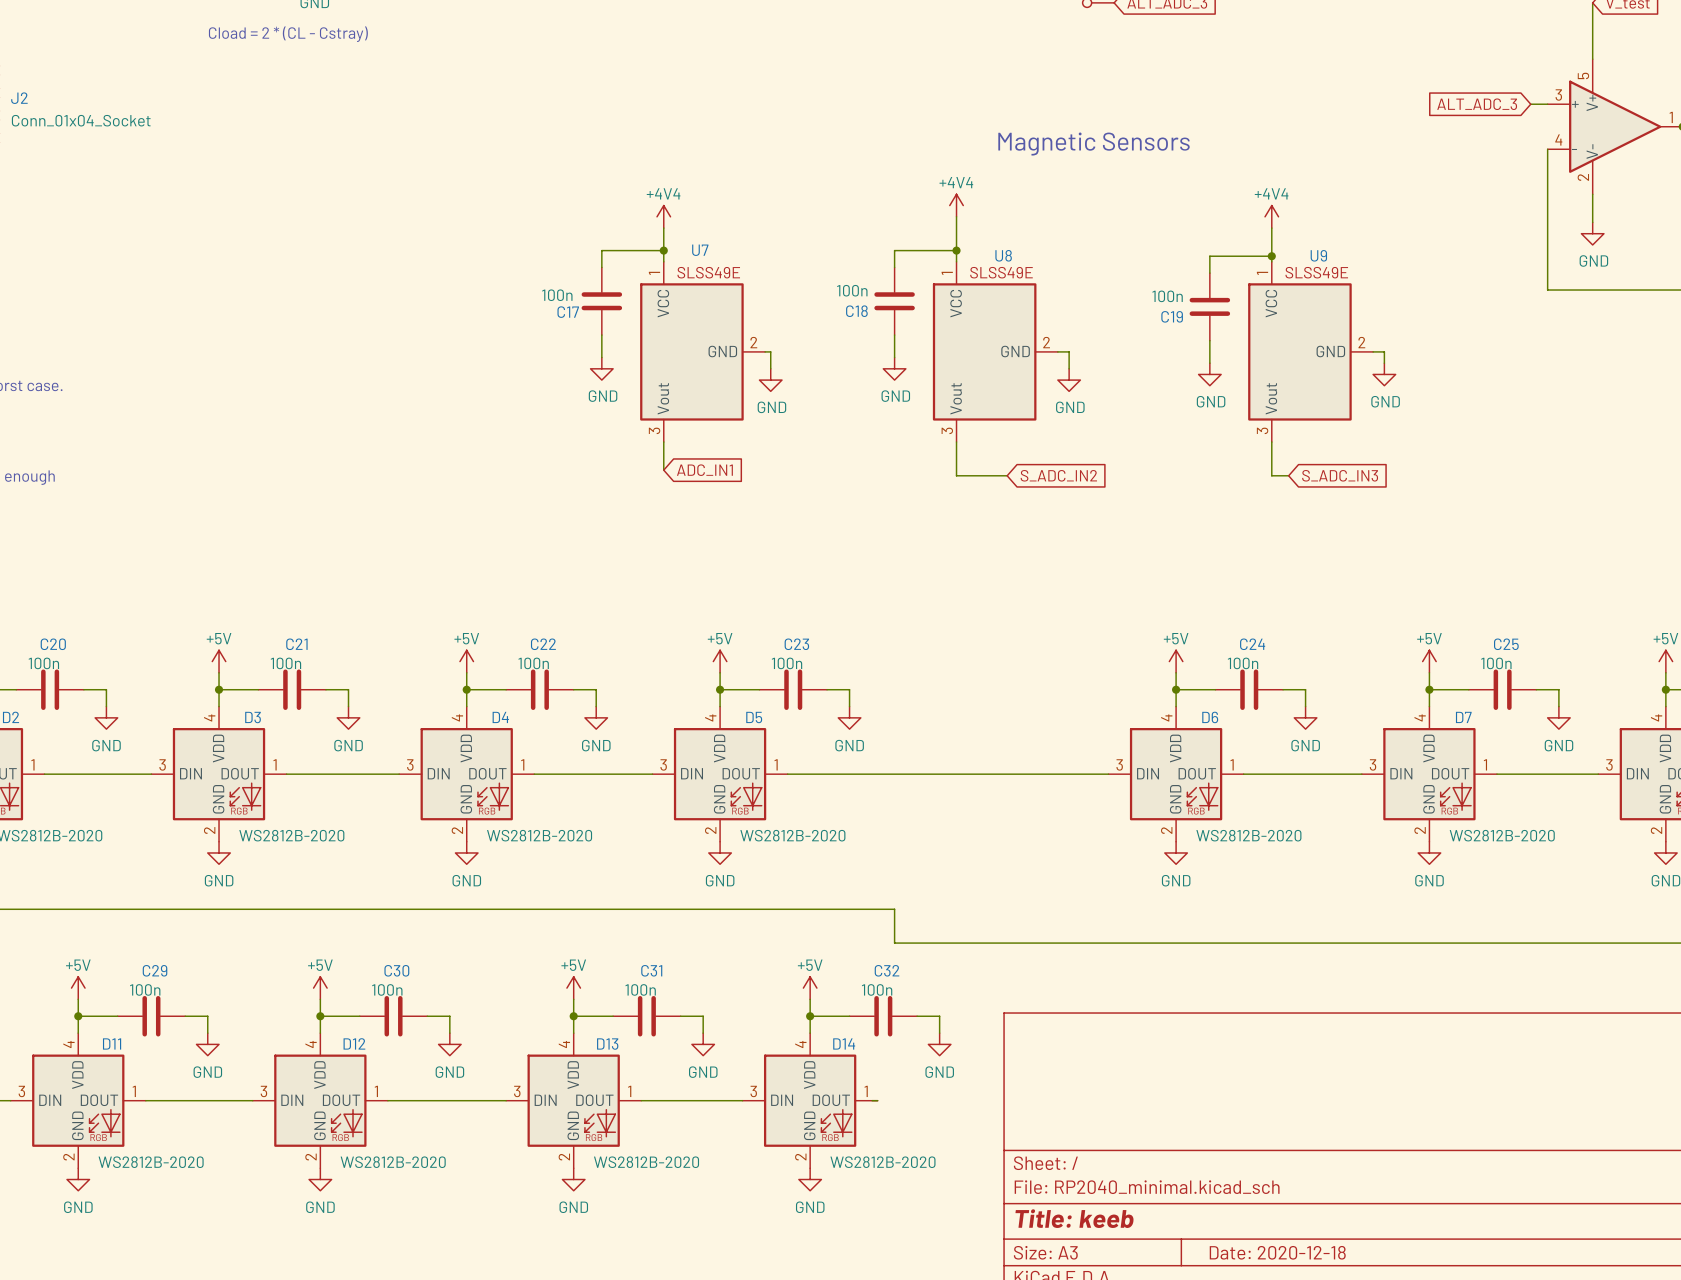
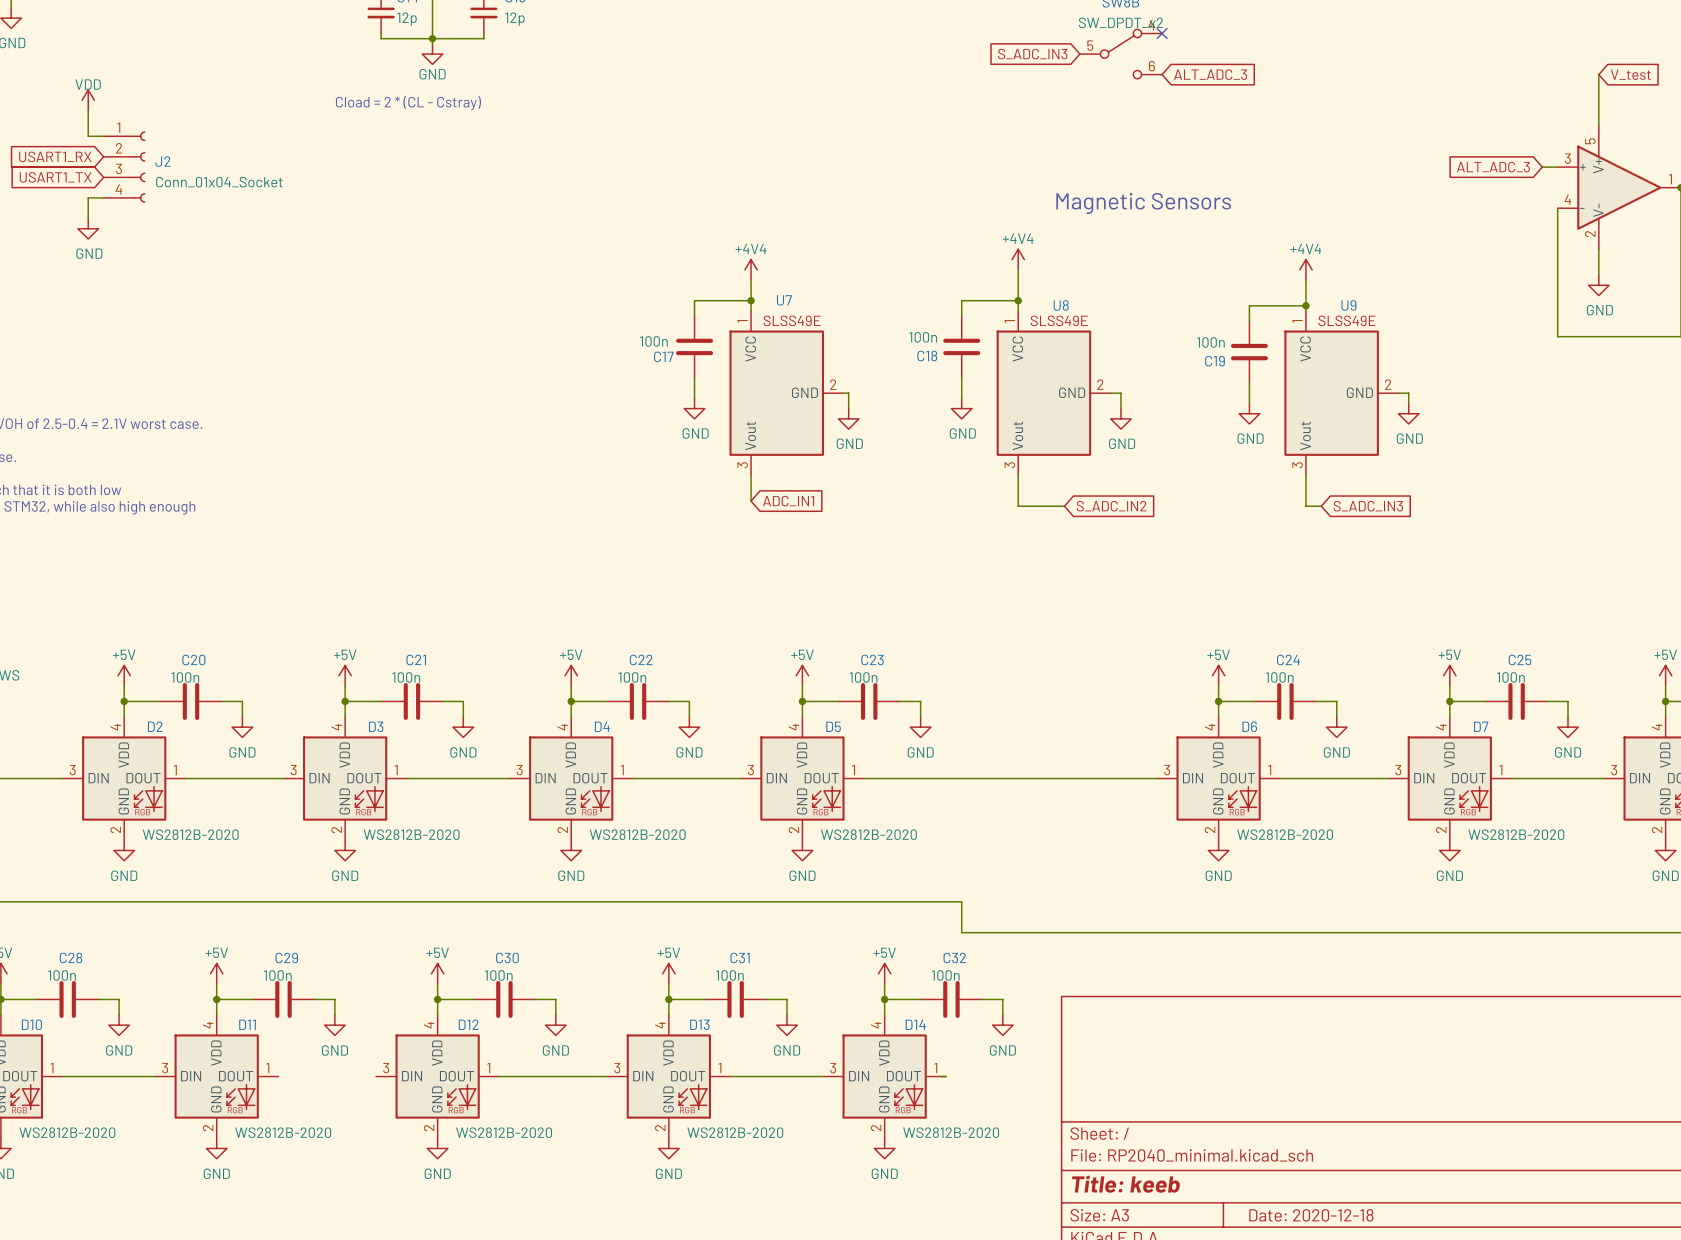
wire: (145, 1100) (252, 1100) -> none

